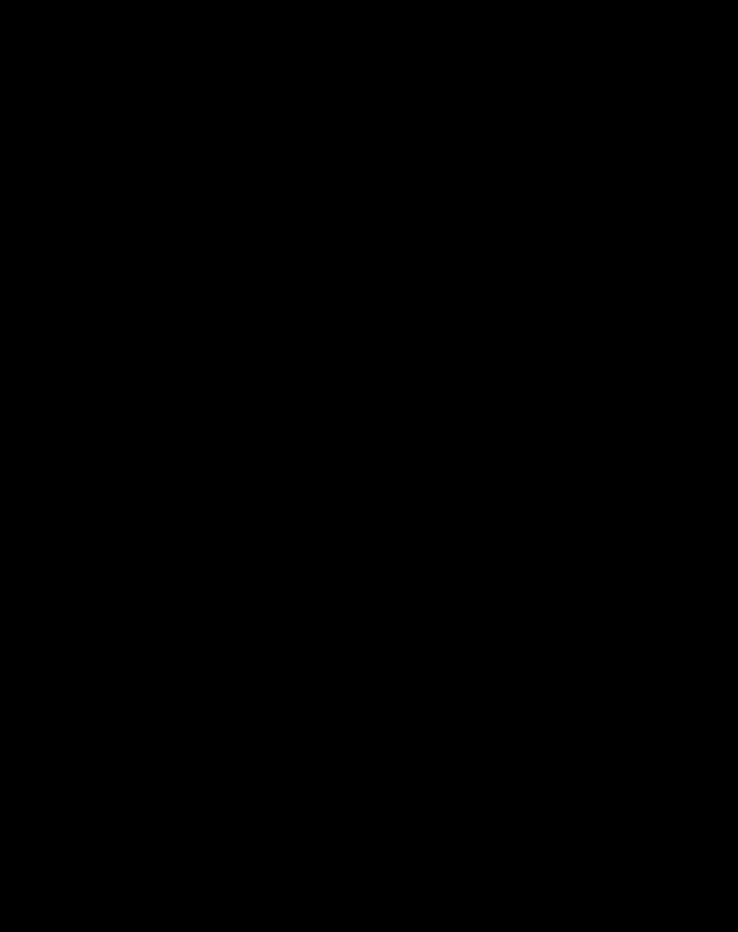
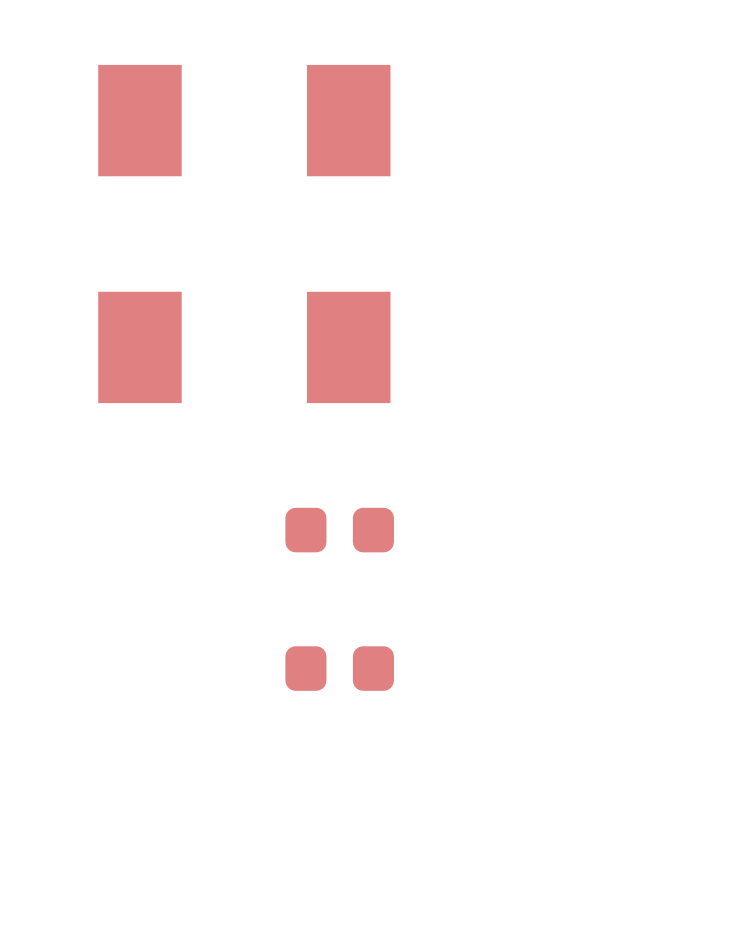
part: none -> (244, 120)
part: none -> (244, 347)
part: none -> (339, 530)
part: none -> (339, 668)

